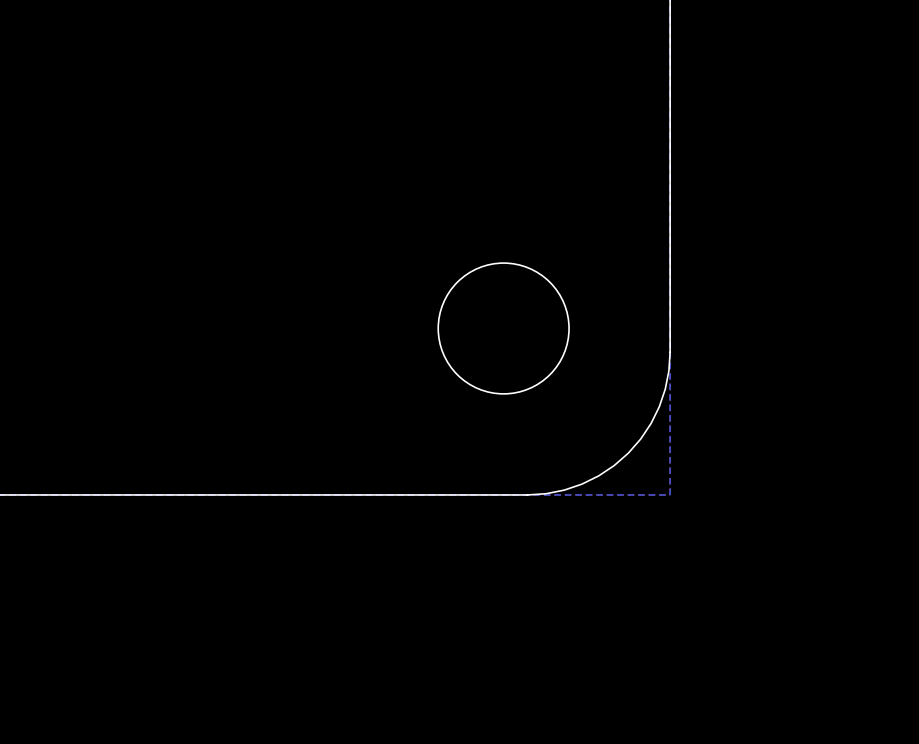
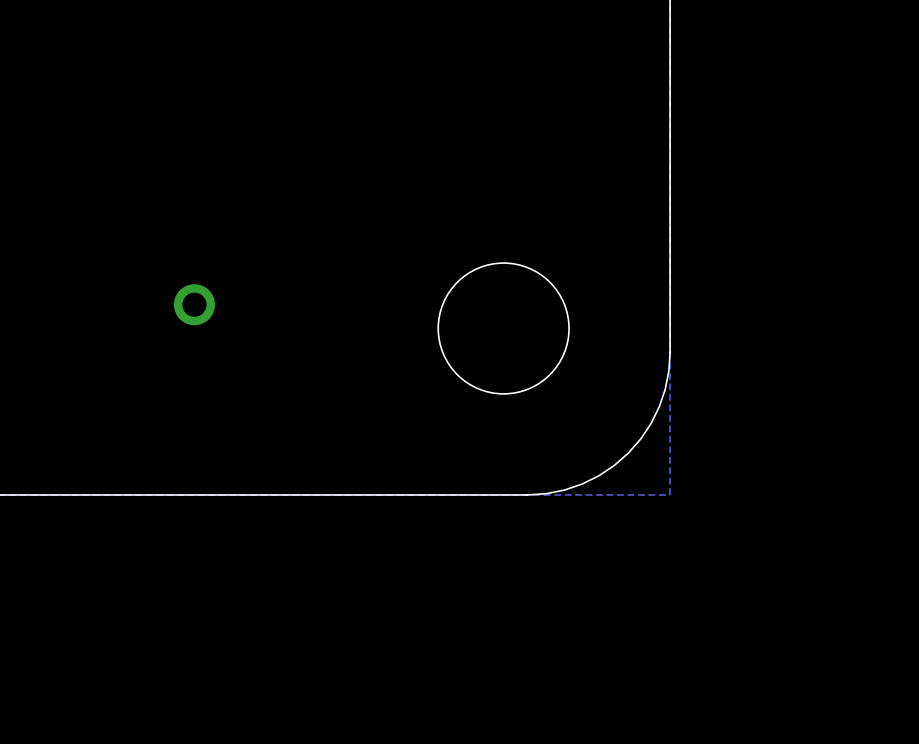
via: none -> (194, 304)

